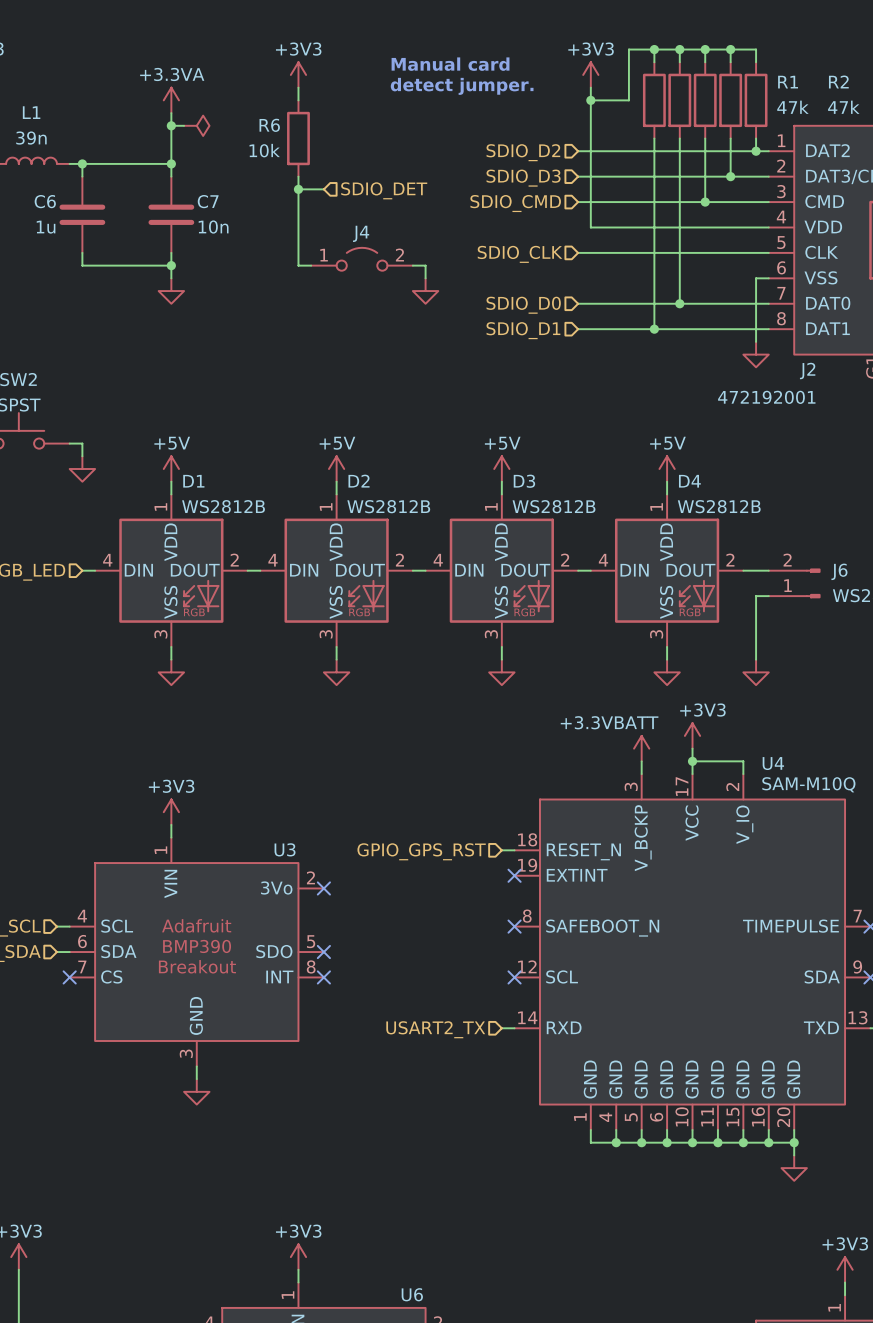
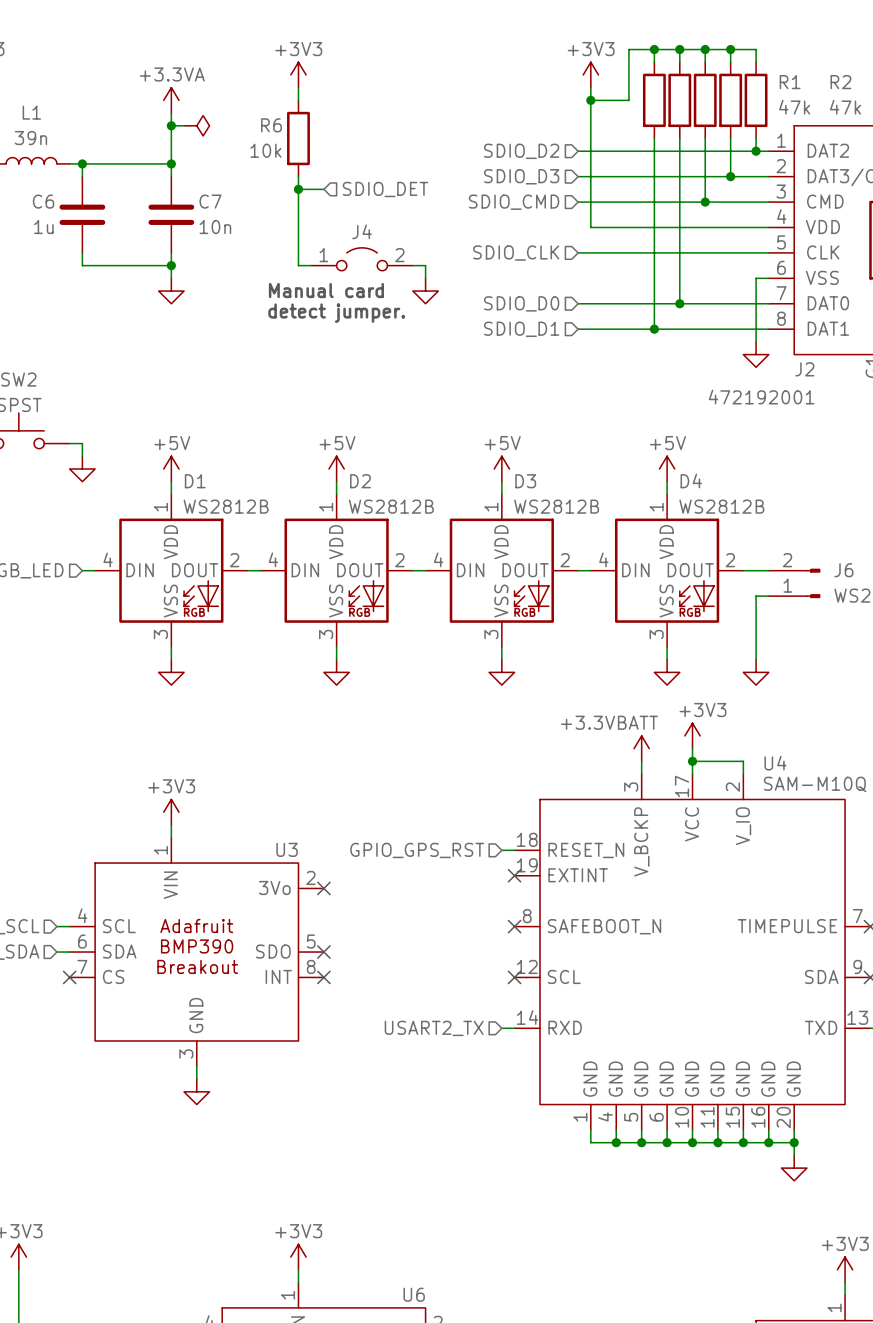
text: Manual card (450, 64) -> none
text: detect jumper. (462, 86) -> none
text: none -> Manual card (326, 290)
text: none -> detect jumper. (336, 313)

